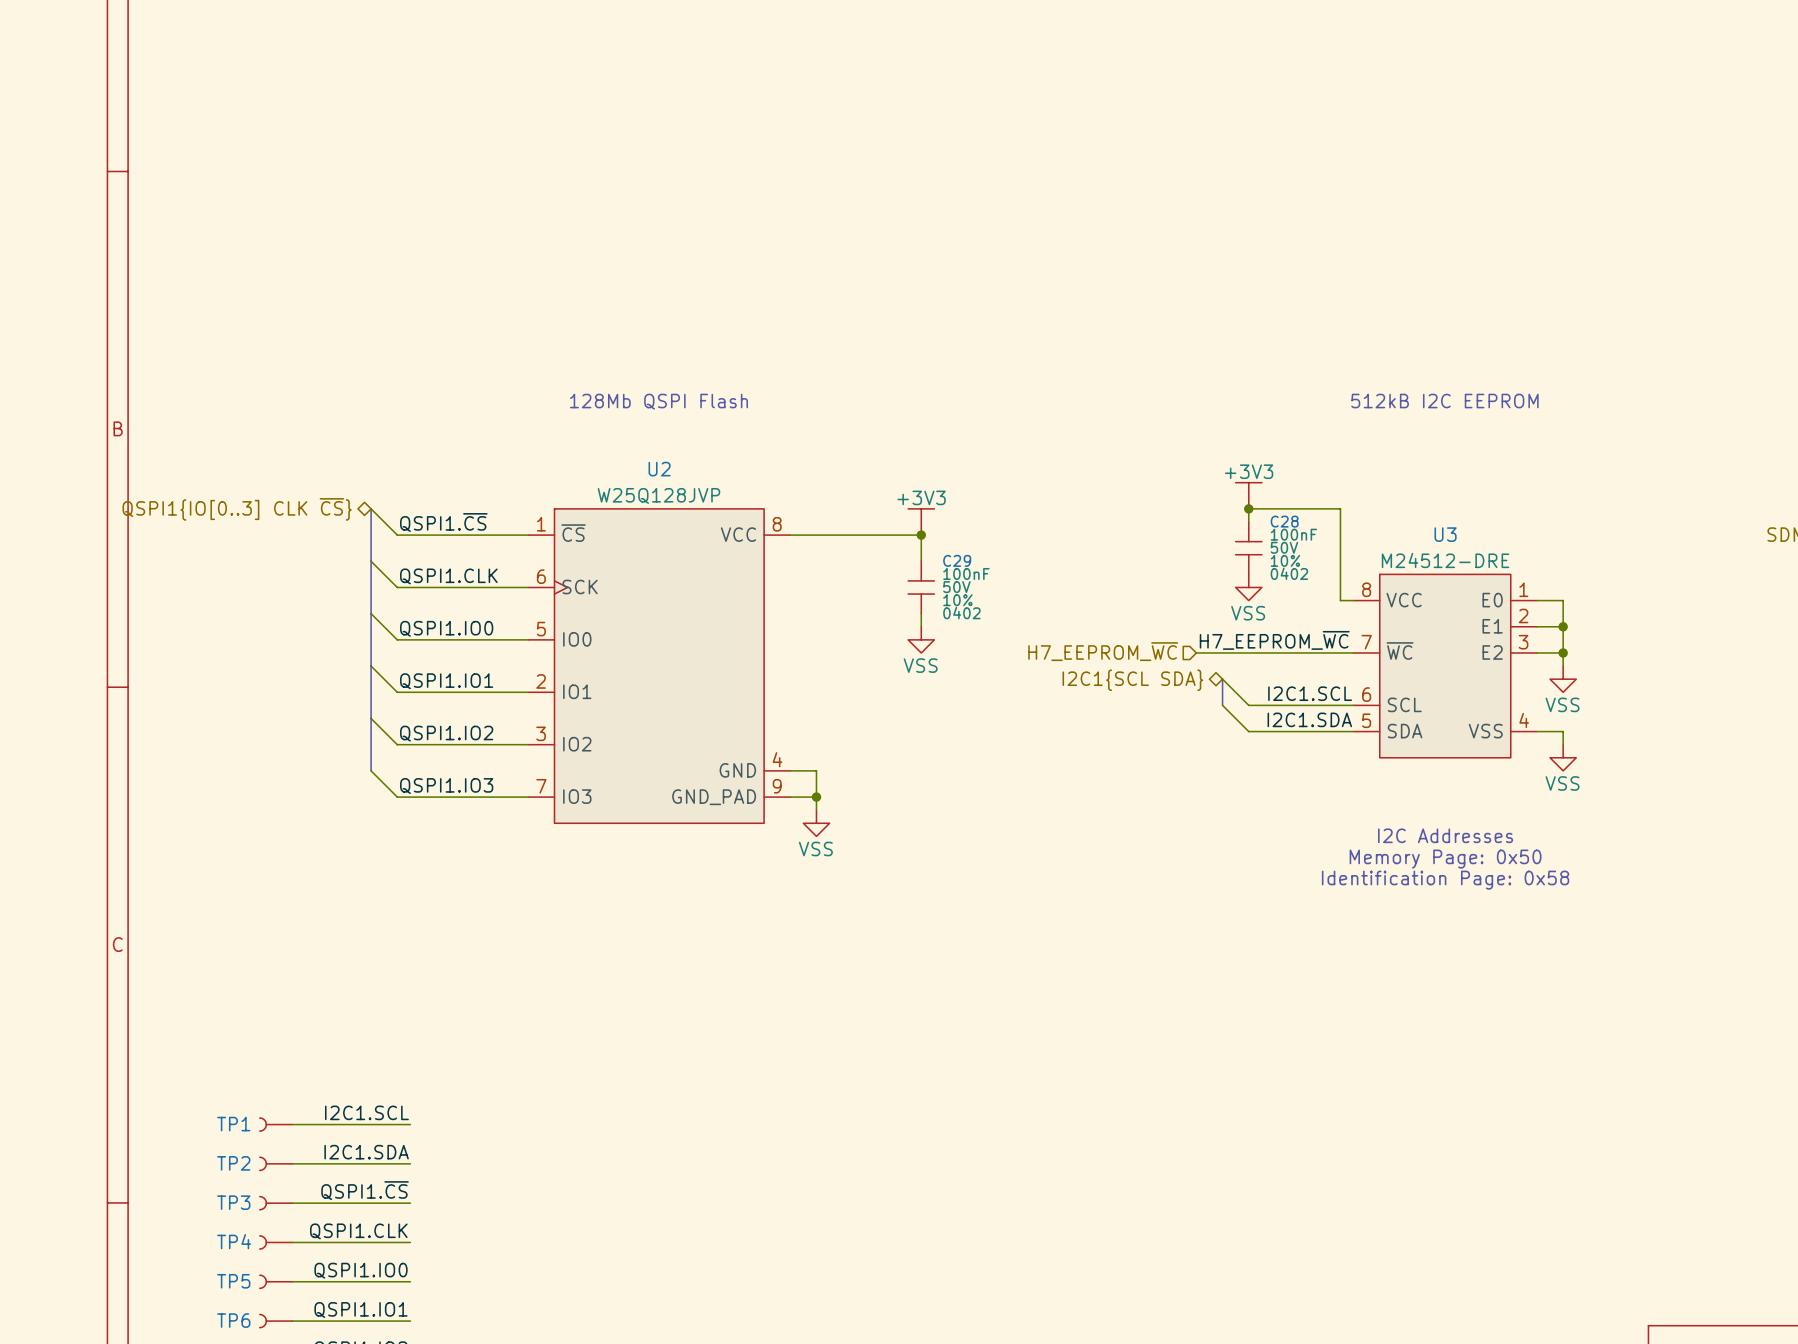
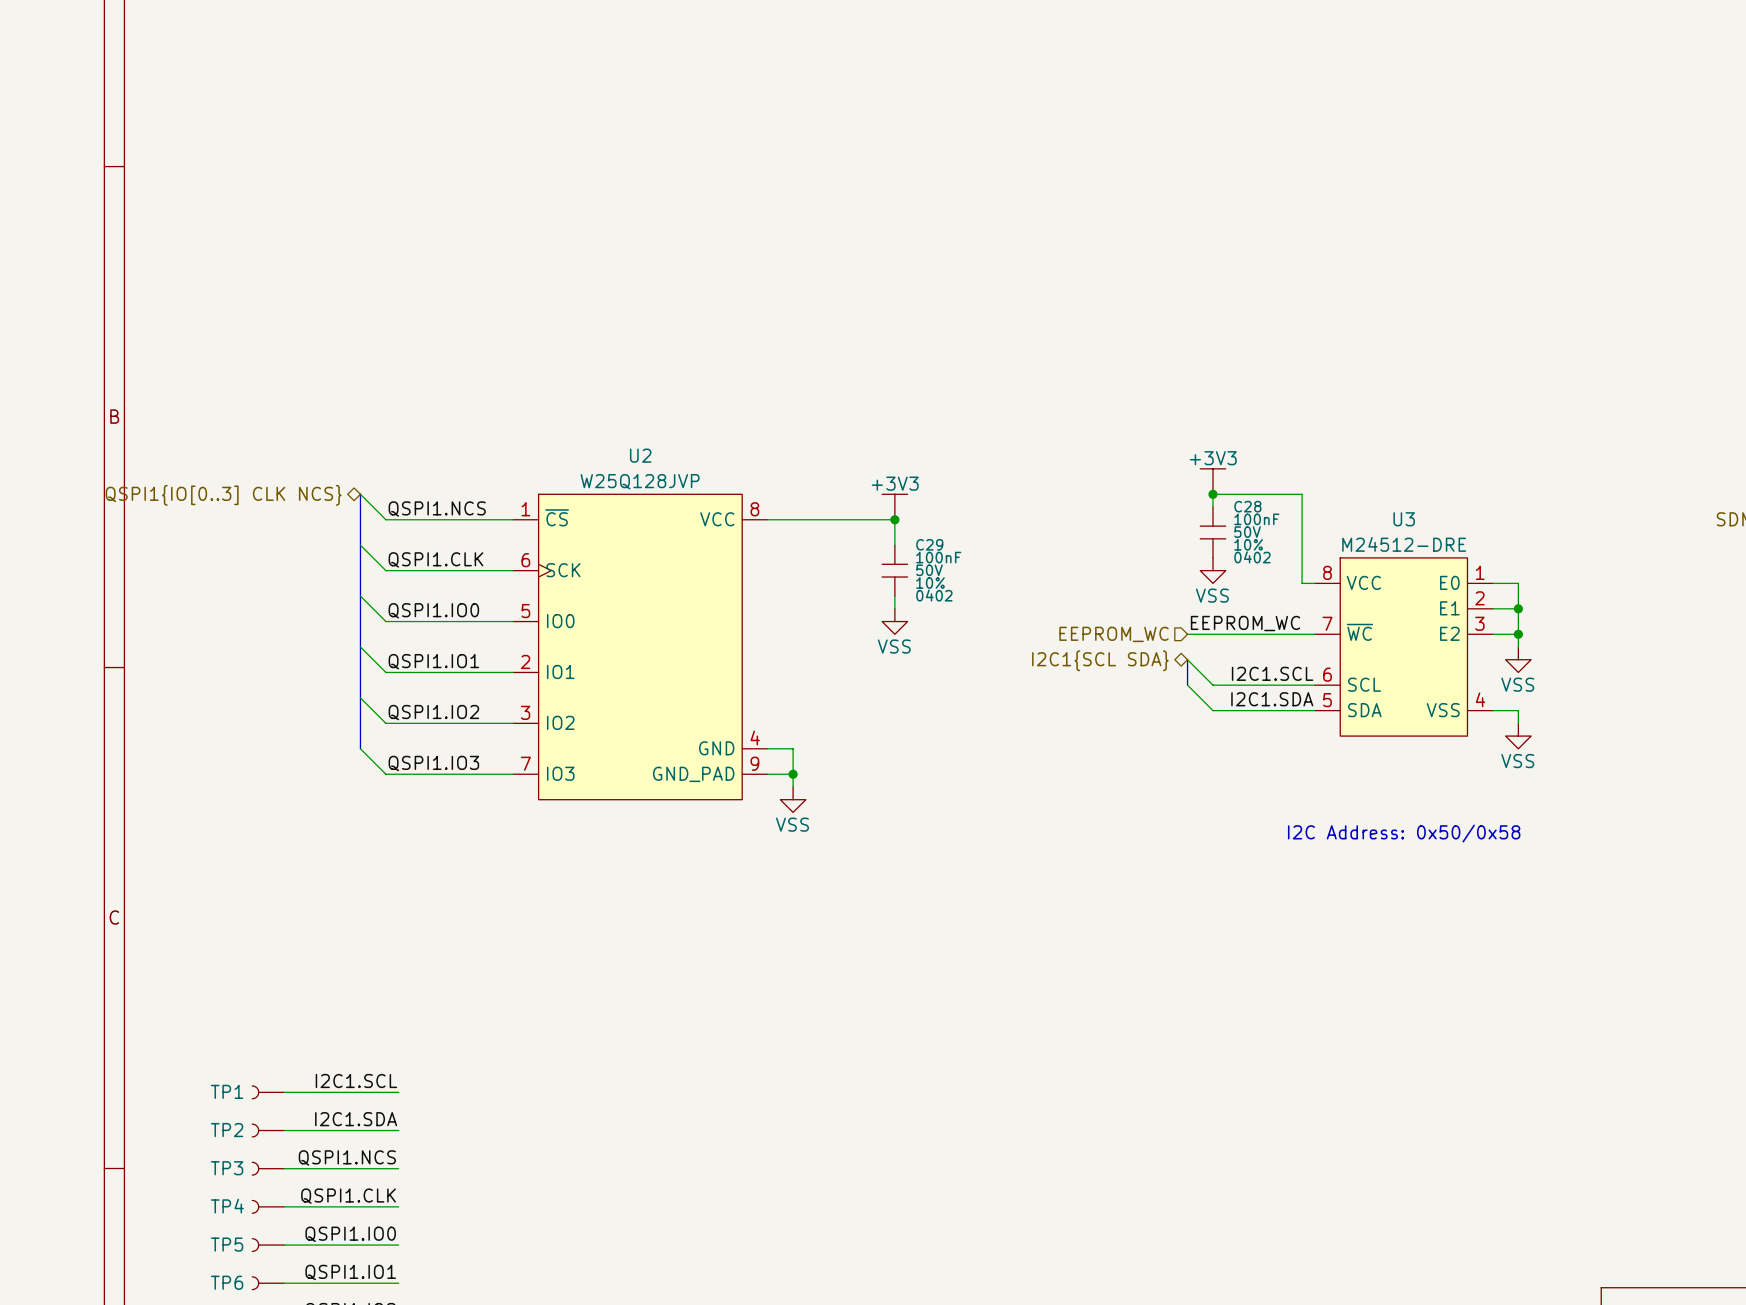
text: 128Mb QSPI Flash (658, 401) -> none
text: 512kB I2C EEPROM (1444, 401) -> none
hierarchical label: QSPI1{IO[0..3] CLK ~{CS}} (237, 509) -> QSPI1{IO[0..3] CLK NCS} (223, 495)
label: QSPI1.~{CS} (443, 522) -> QSPI1.NCS (437, 509)
label: H7_EEPROM_~{WC} (1274, 640) -> EEPROM_WC (1245, 623)
hierarchical label: H7_EEPROM_~{WC} (1103, 651) -> EEPROM_WC (1114, 634)
wire: (1196, 652) (1222, 652) -> none
text: I2C Addresses (1445, 835) -> none
text: Memory Page: 0x50 (1445, 859) -> I2C Address: 0x50/0x58 (1404, 833)
text: Identification Page: 0x58 (1445, 880) -> none
label: QSPI1.~{CS} (365, 1190) -> QSPI1.NCS (347, 1157)

